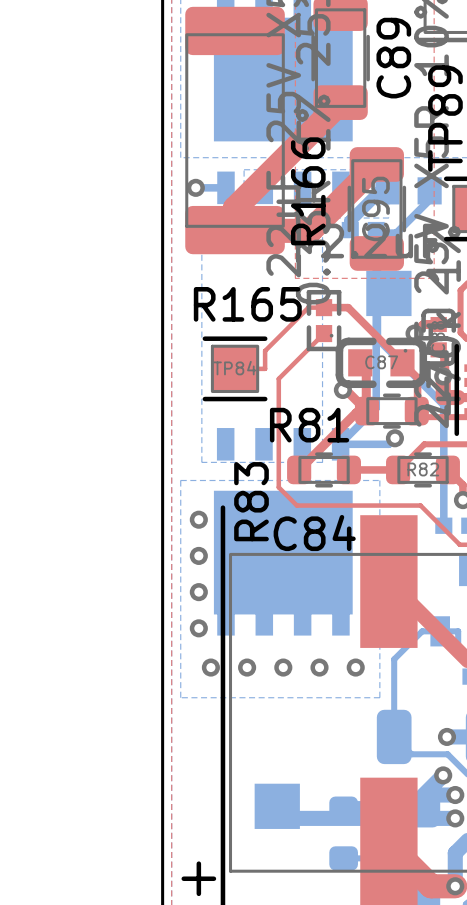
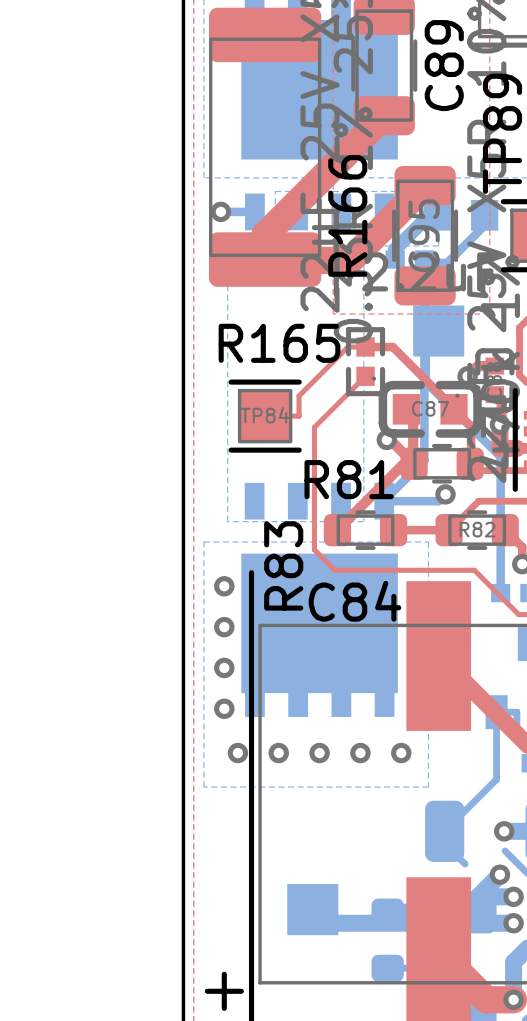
bottom track: (440, 631) (422, 631) (394, 659) (394, 736) (411, 754) (447, 754) -> (496, 712) (496, 779) (444, 831) (444, 843) (465, 864)

